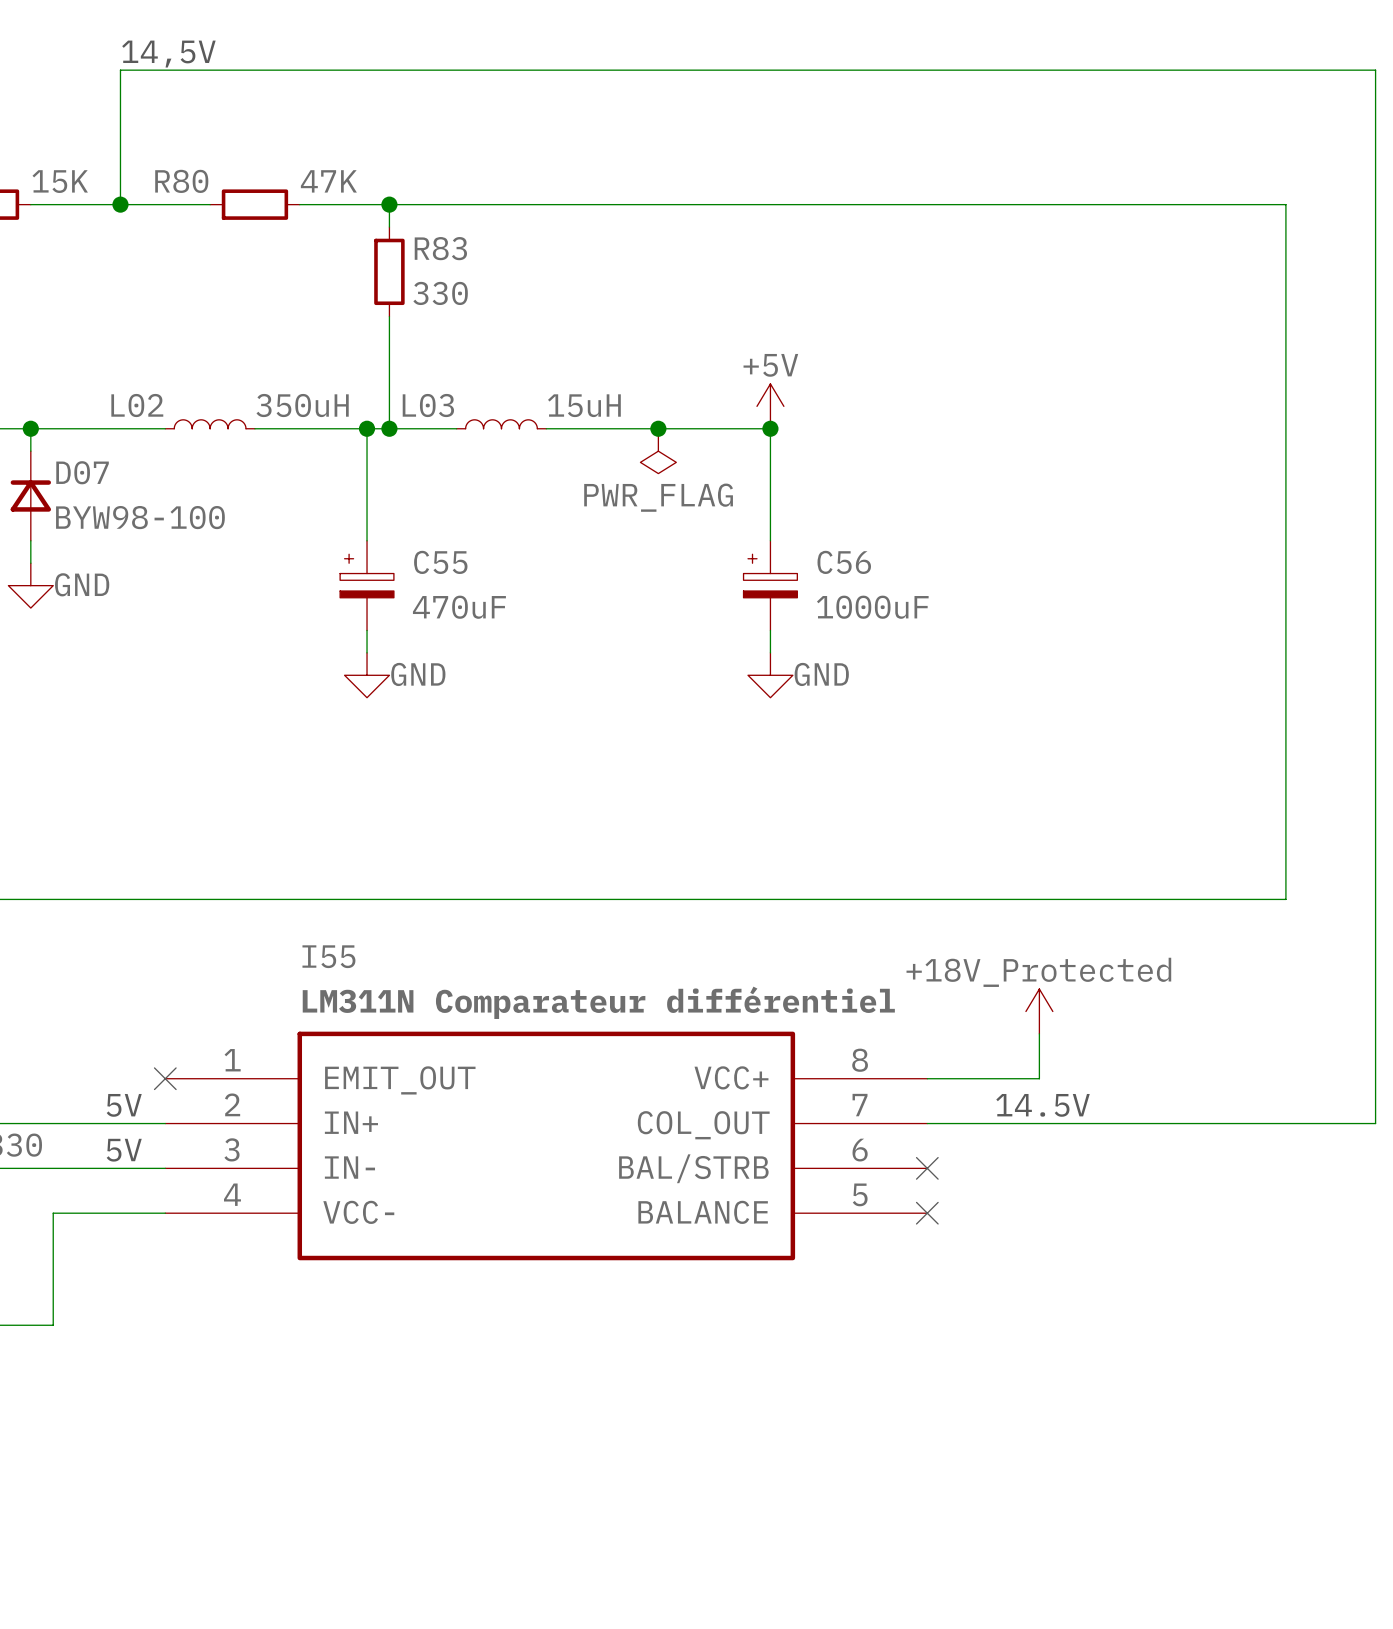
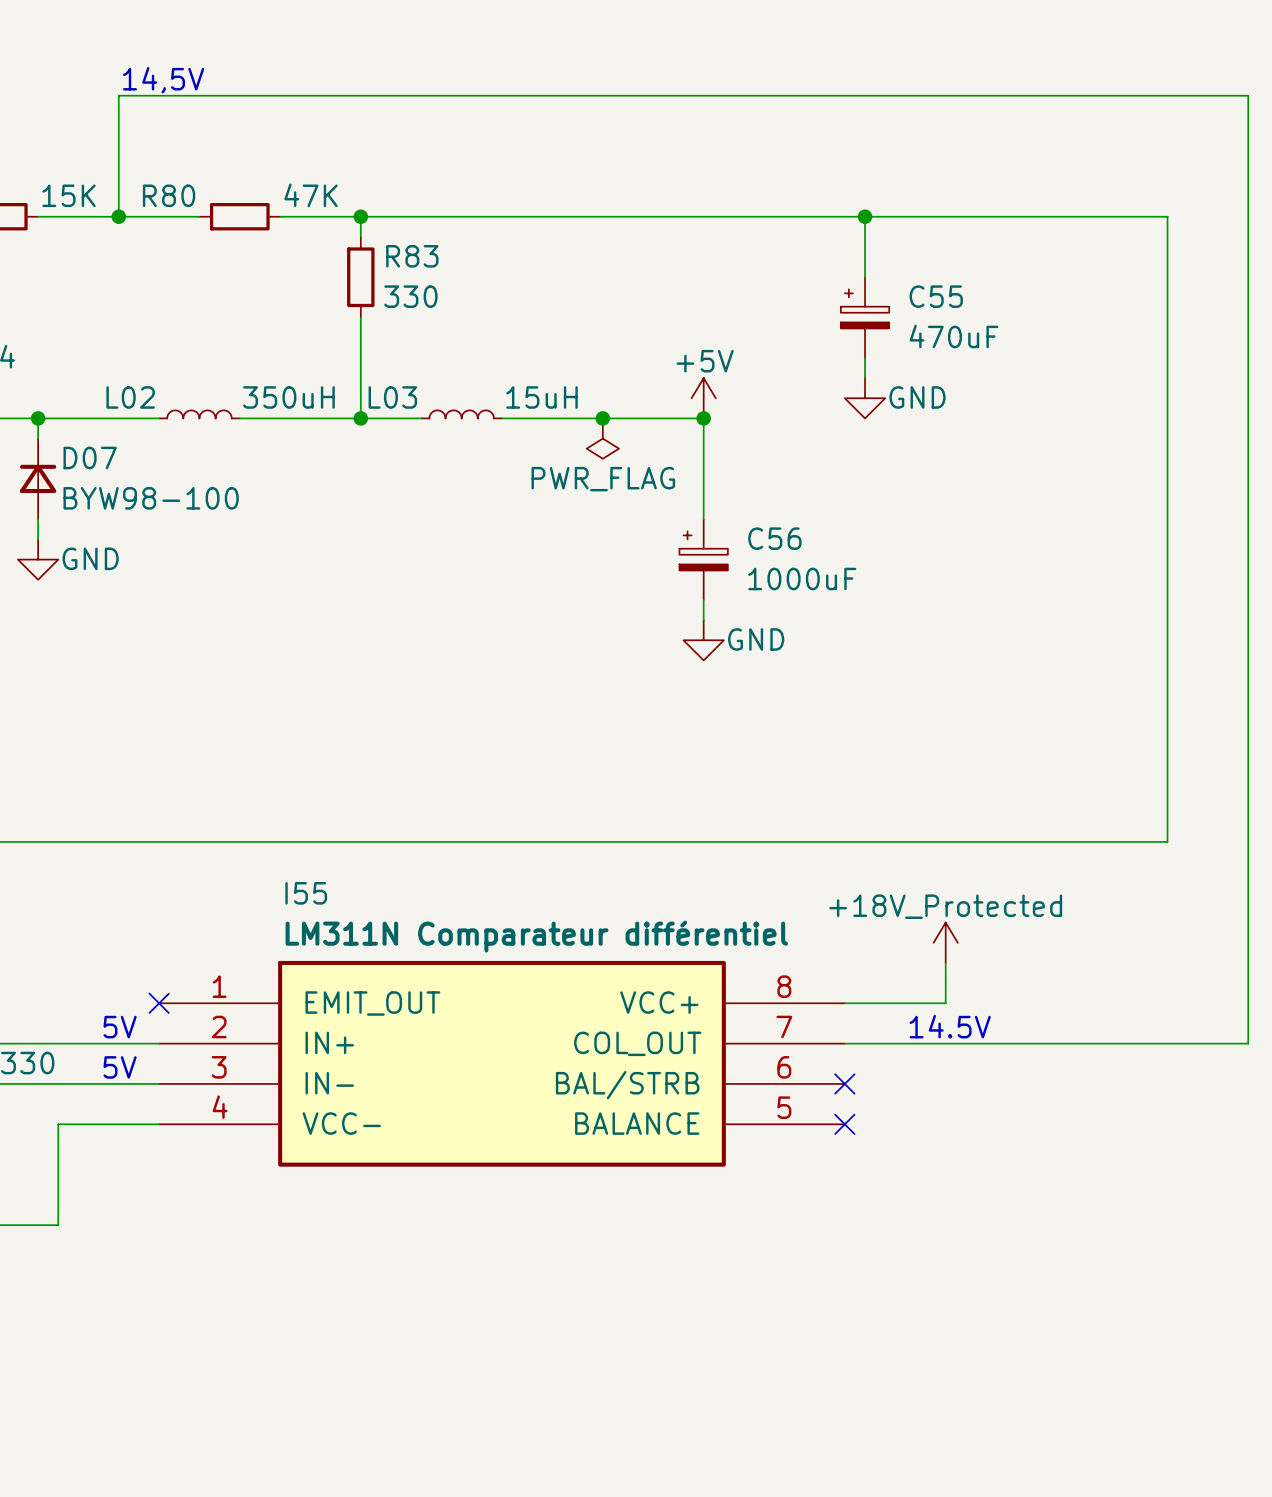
wire: none -> (865, 216) (865, 277)
junction: none -> (865, 216)
wire: none -> (865, 357) (865, 378)
power symbol: none -> GND (865, 398)
wire: (367, 428) (367, 540) -> none
junction: (367, 428) -> none
C55 position: (367, 585) -> (865, 317)
wire: (367, 630) (367, 652) -> none
power symbol: GND (367, 675) -> none

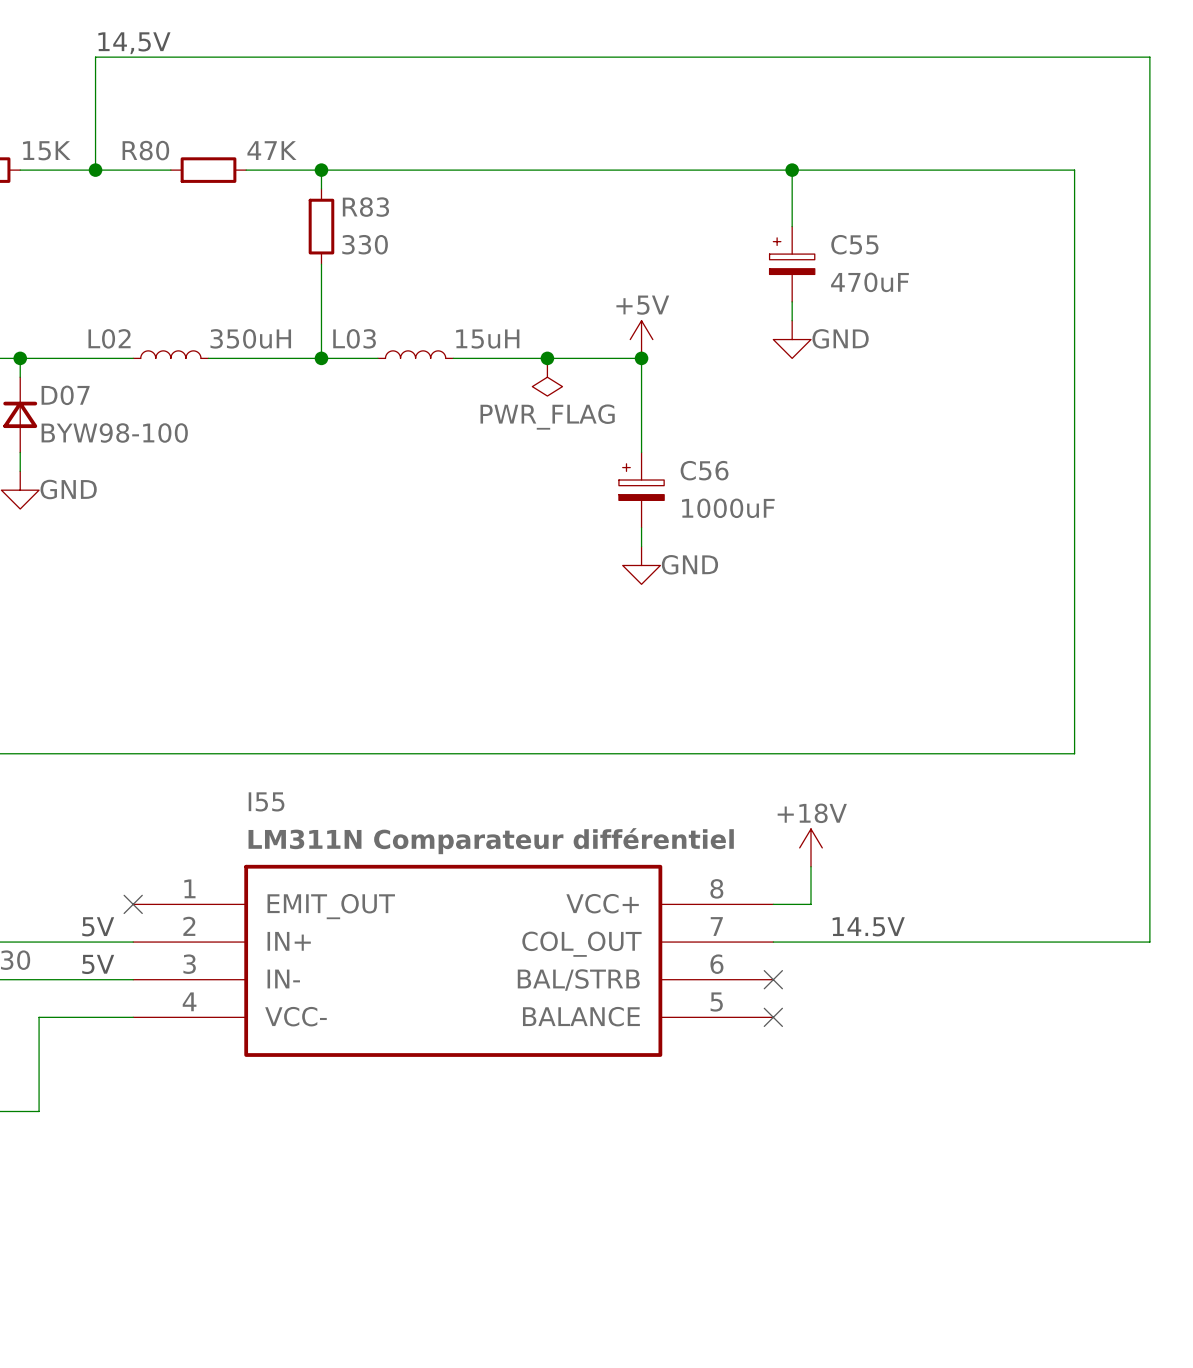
power symbol: none -> +18V (810, 847)
power symbol: +18V_Protected (945, 942) -> none
wire: (945, 962) (945, 1003) (885, 1003) -> (810, 866) (810, 904)

